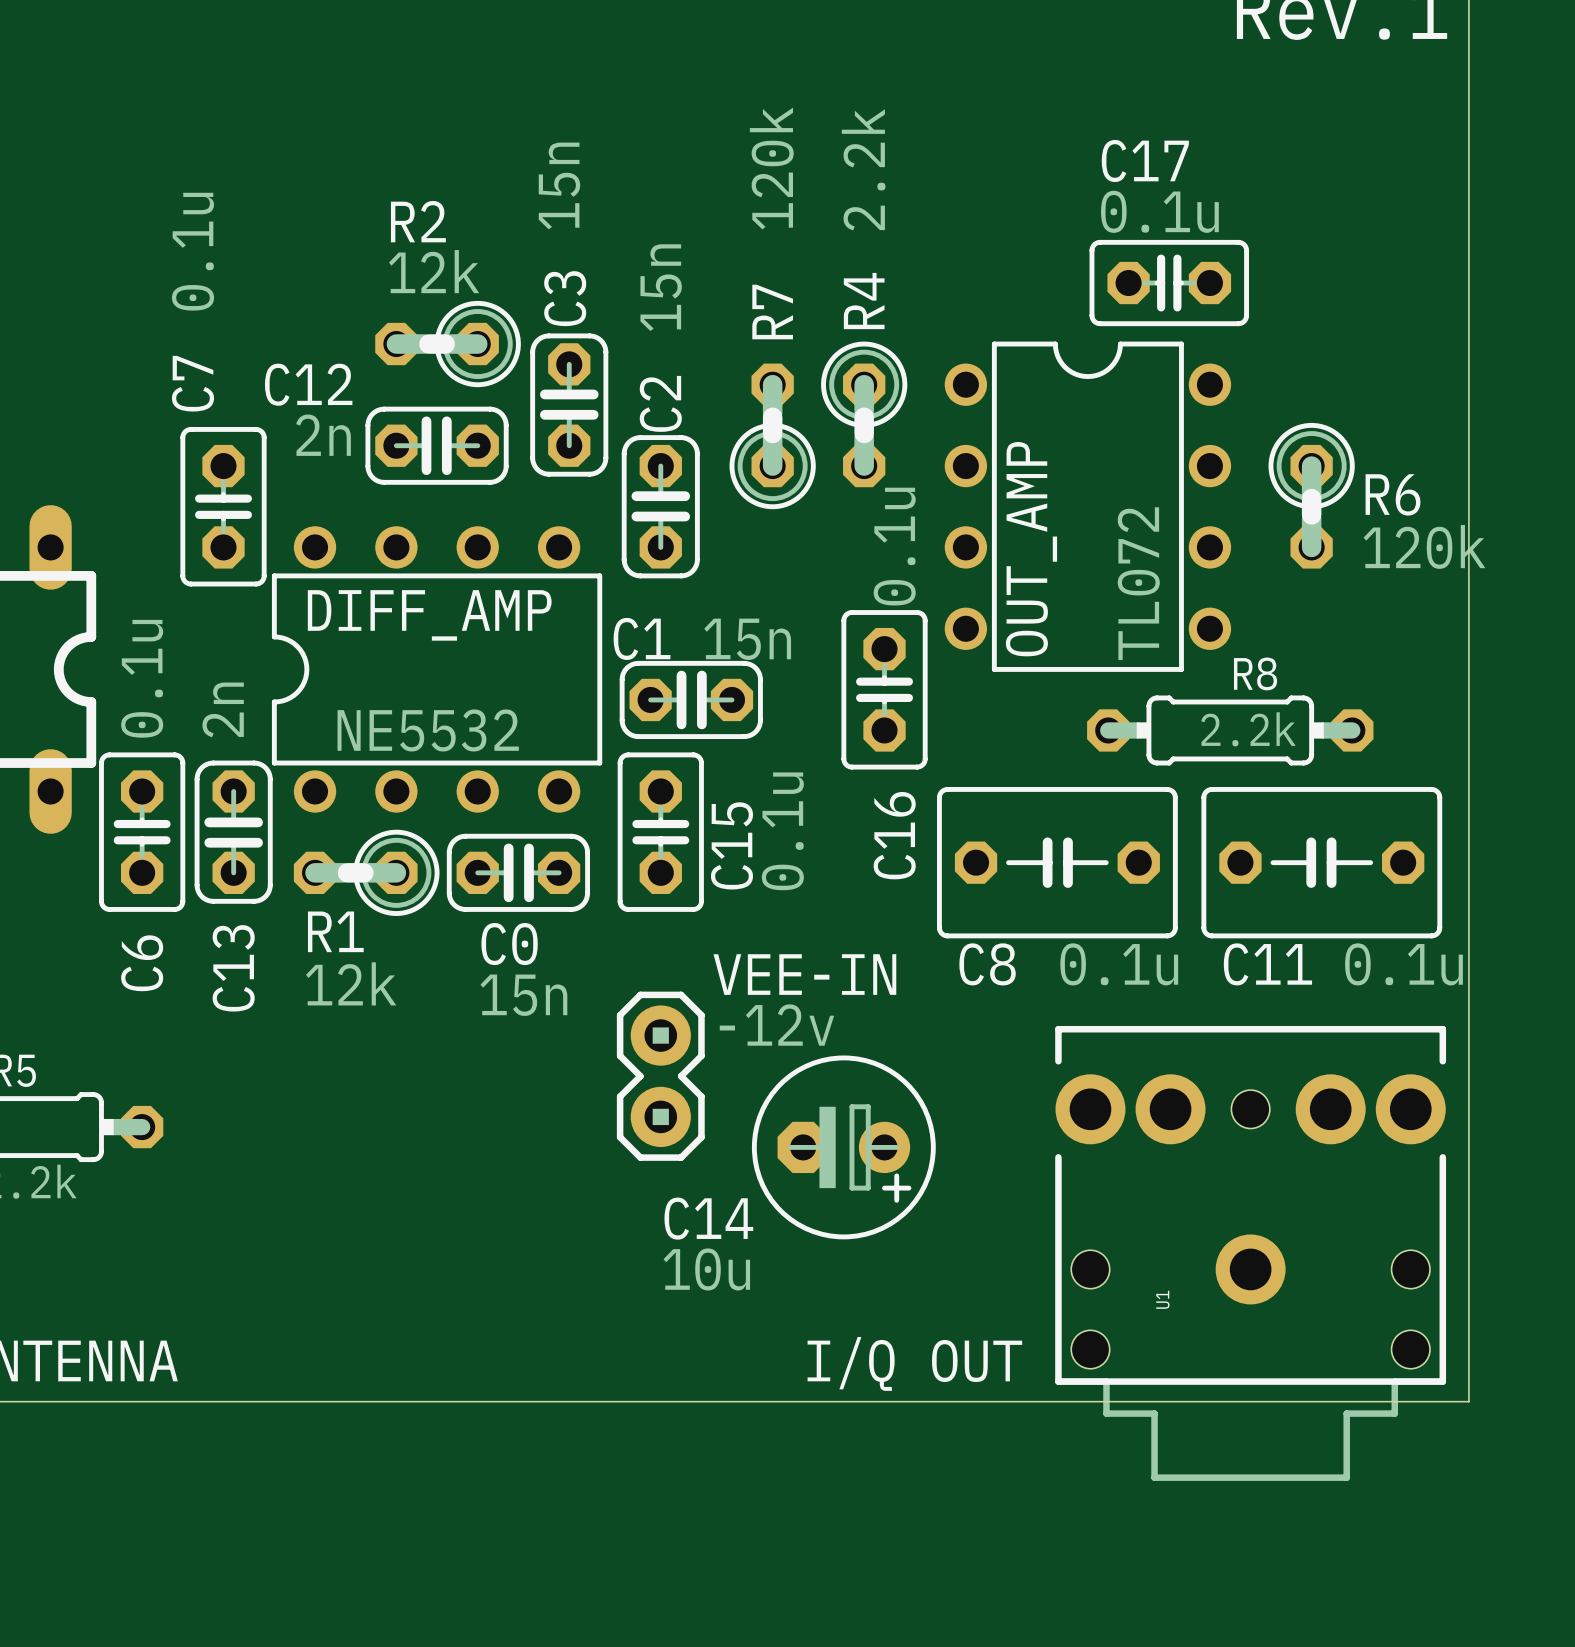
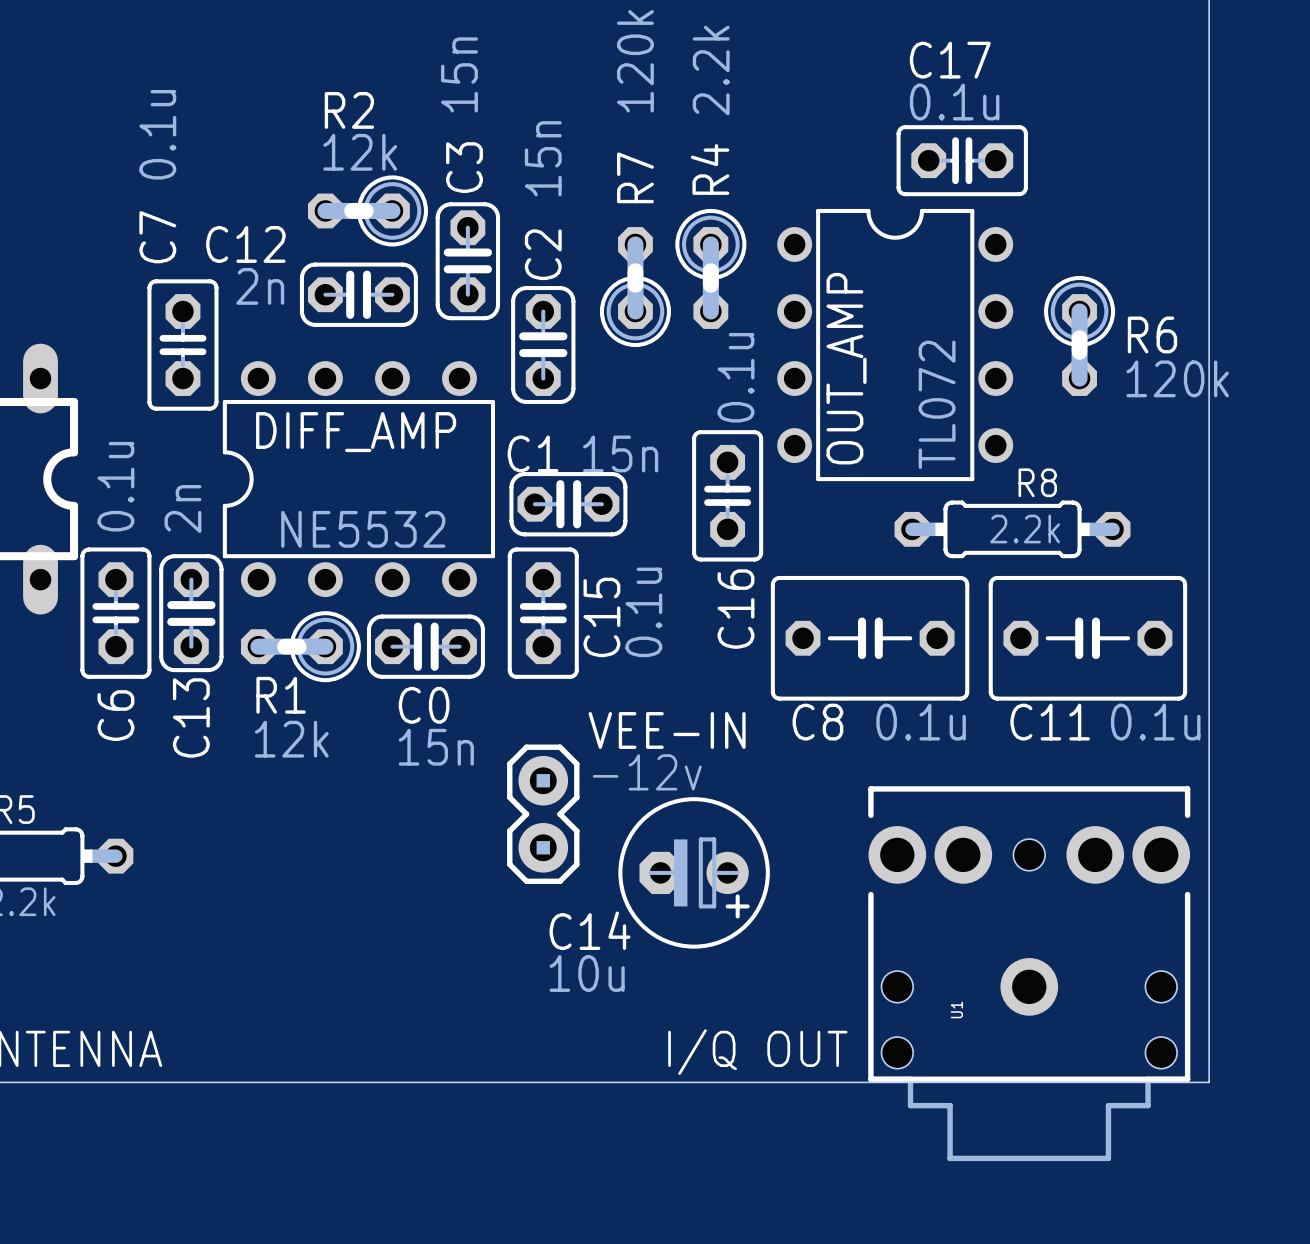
U1 position: (1250, 1253) -> (1029, 973)

